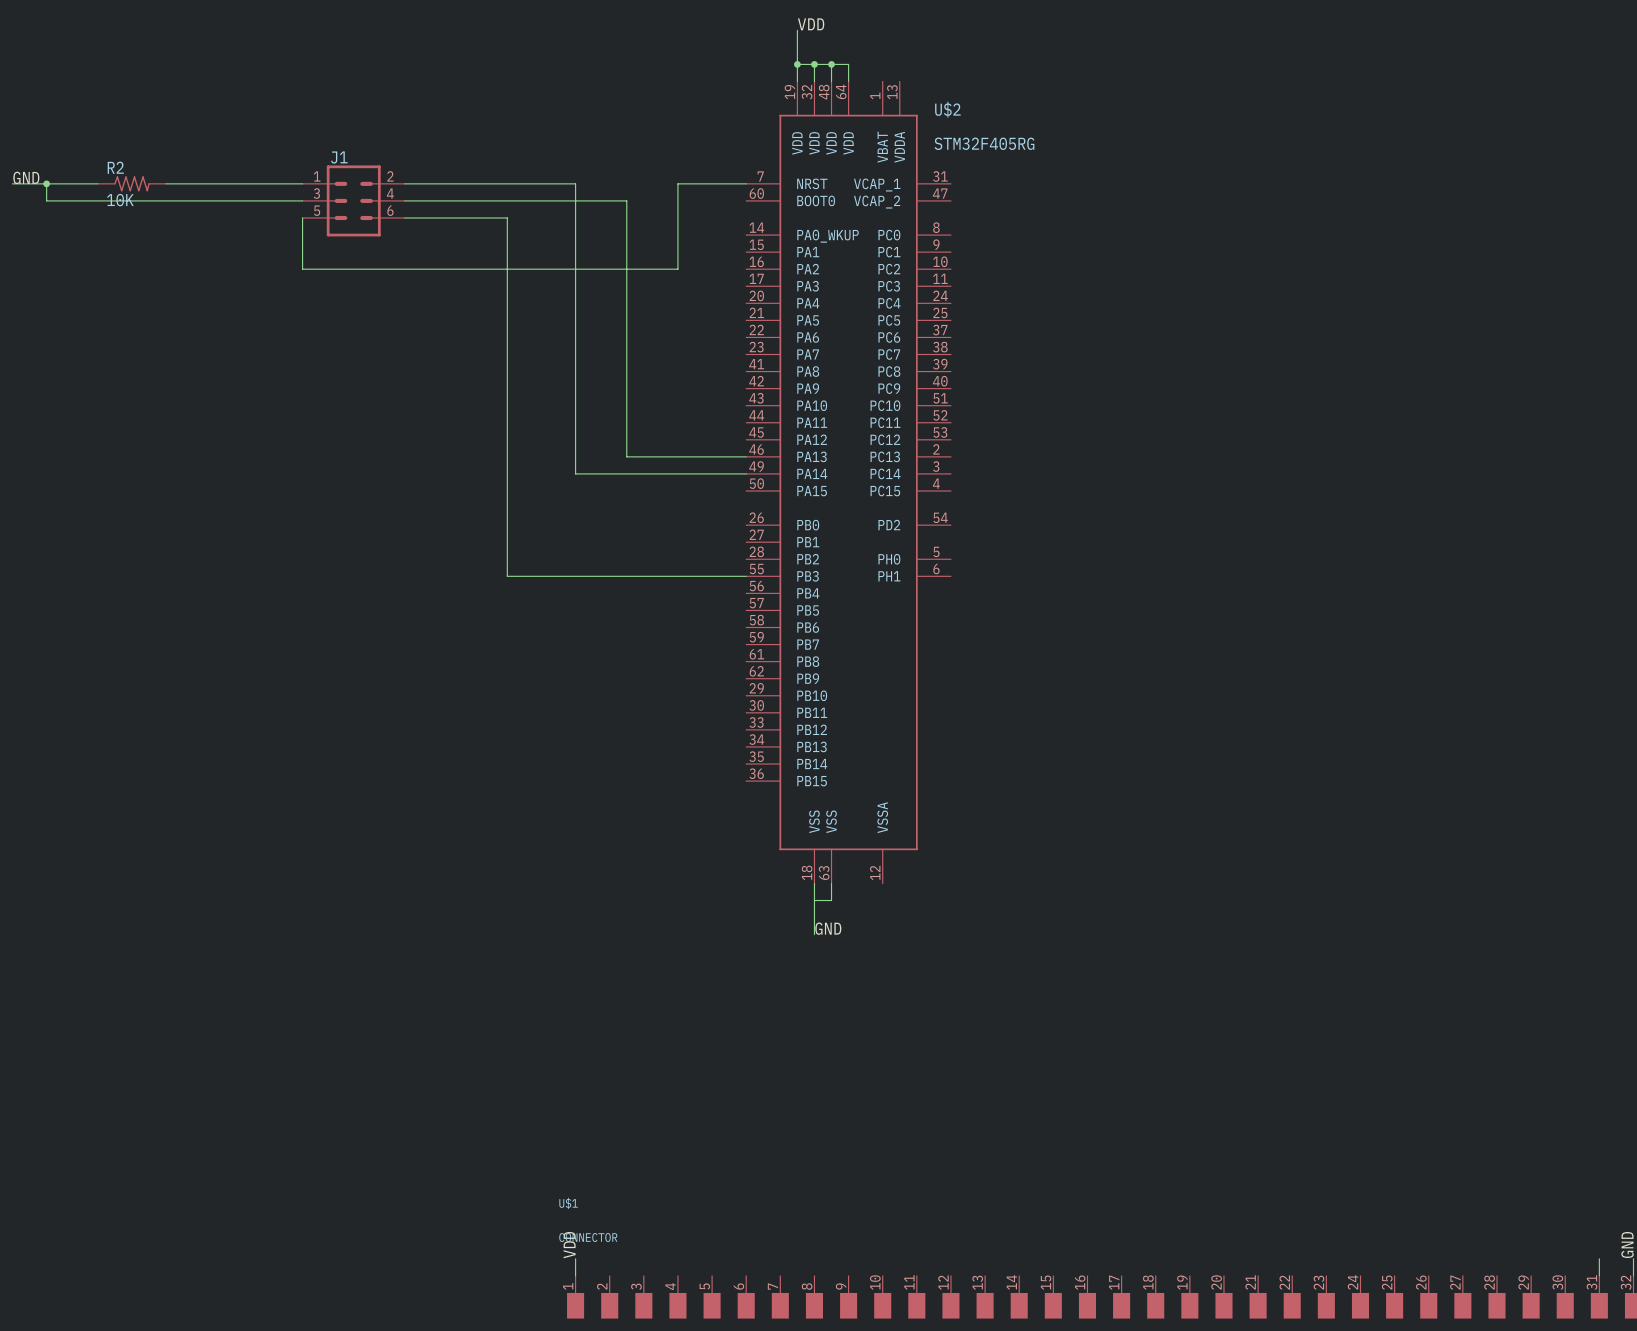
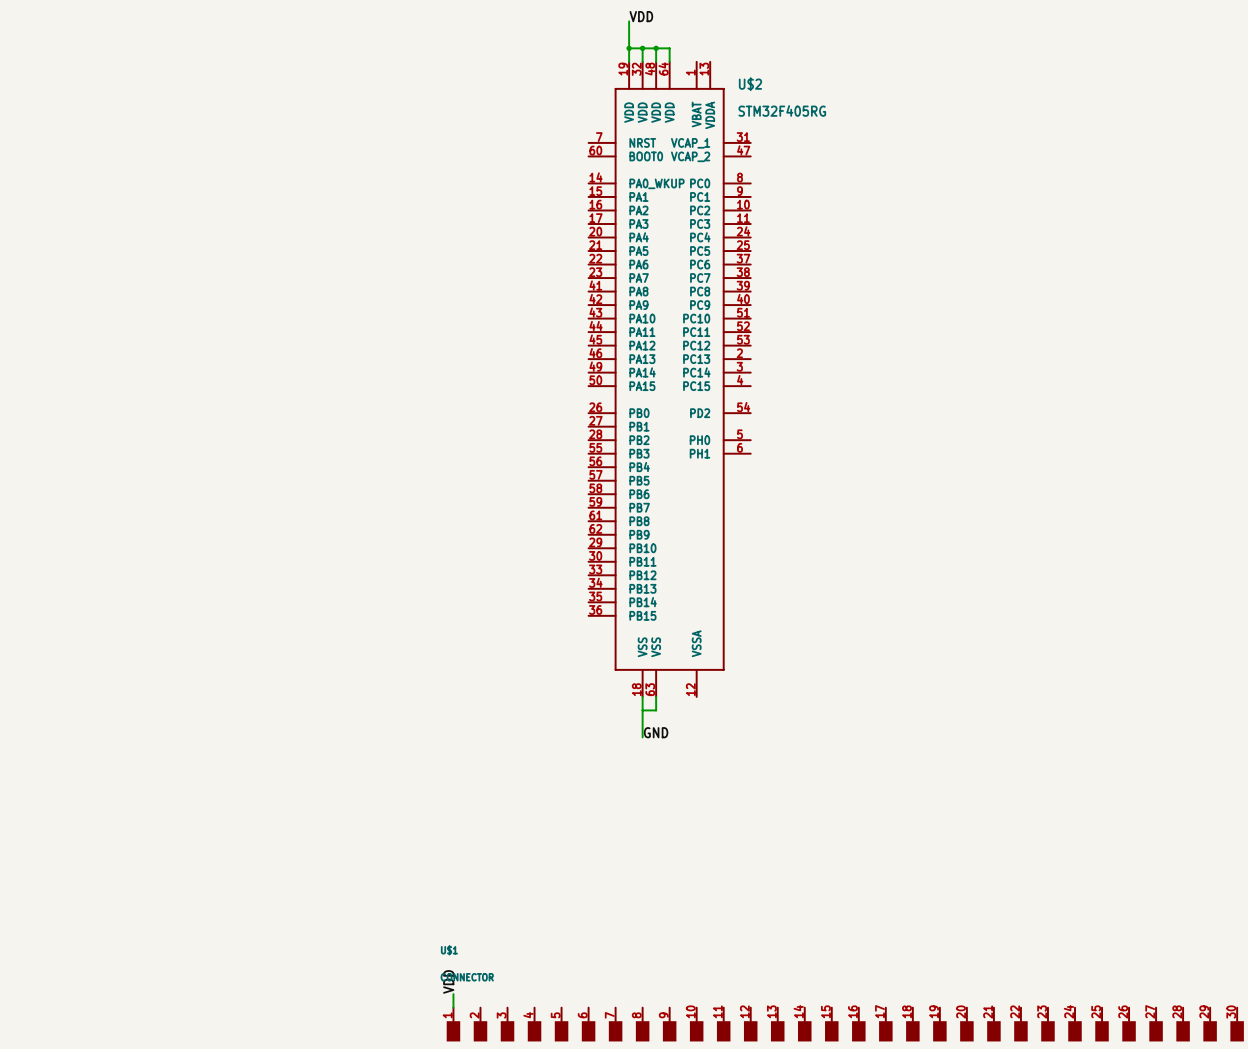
label: GND (26, 177) -> none
wire: (12, 183) (97, 183) -> none
wire: (46, 183) (46, 200) (302, 200) -> none
junction: (46, 183) -> none
R2: 10K (131, 183) -> none
wire: (166, 183) (302, 183) -> none
wire: (404, 183) (575, 183) (575, 473) (746, 473) -> none
wire: (746, 183) (677, 183) (677, 269) (302, 269) (302, 217) -> none
J1: (353, 200) -> none
wire: (404, 200) (626, 200) (626, 456) (746, 456) -> none
wire: (404, 217) (507, 217) (507, 576) (746, 576) -> none

